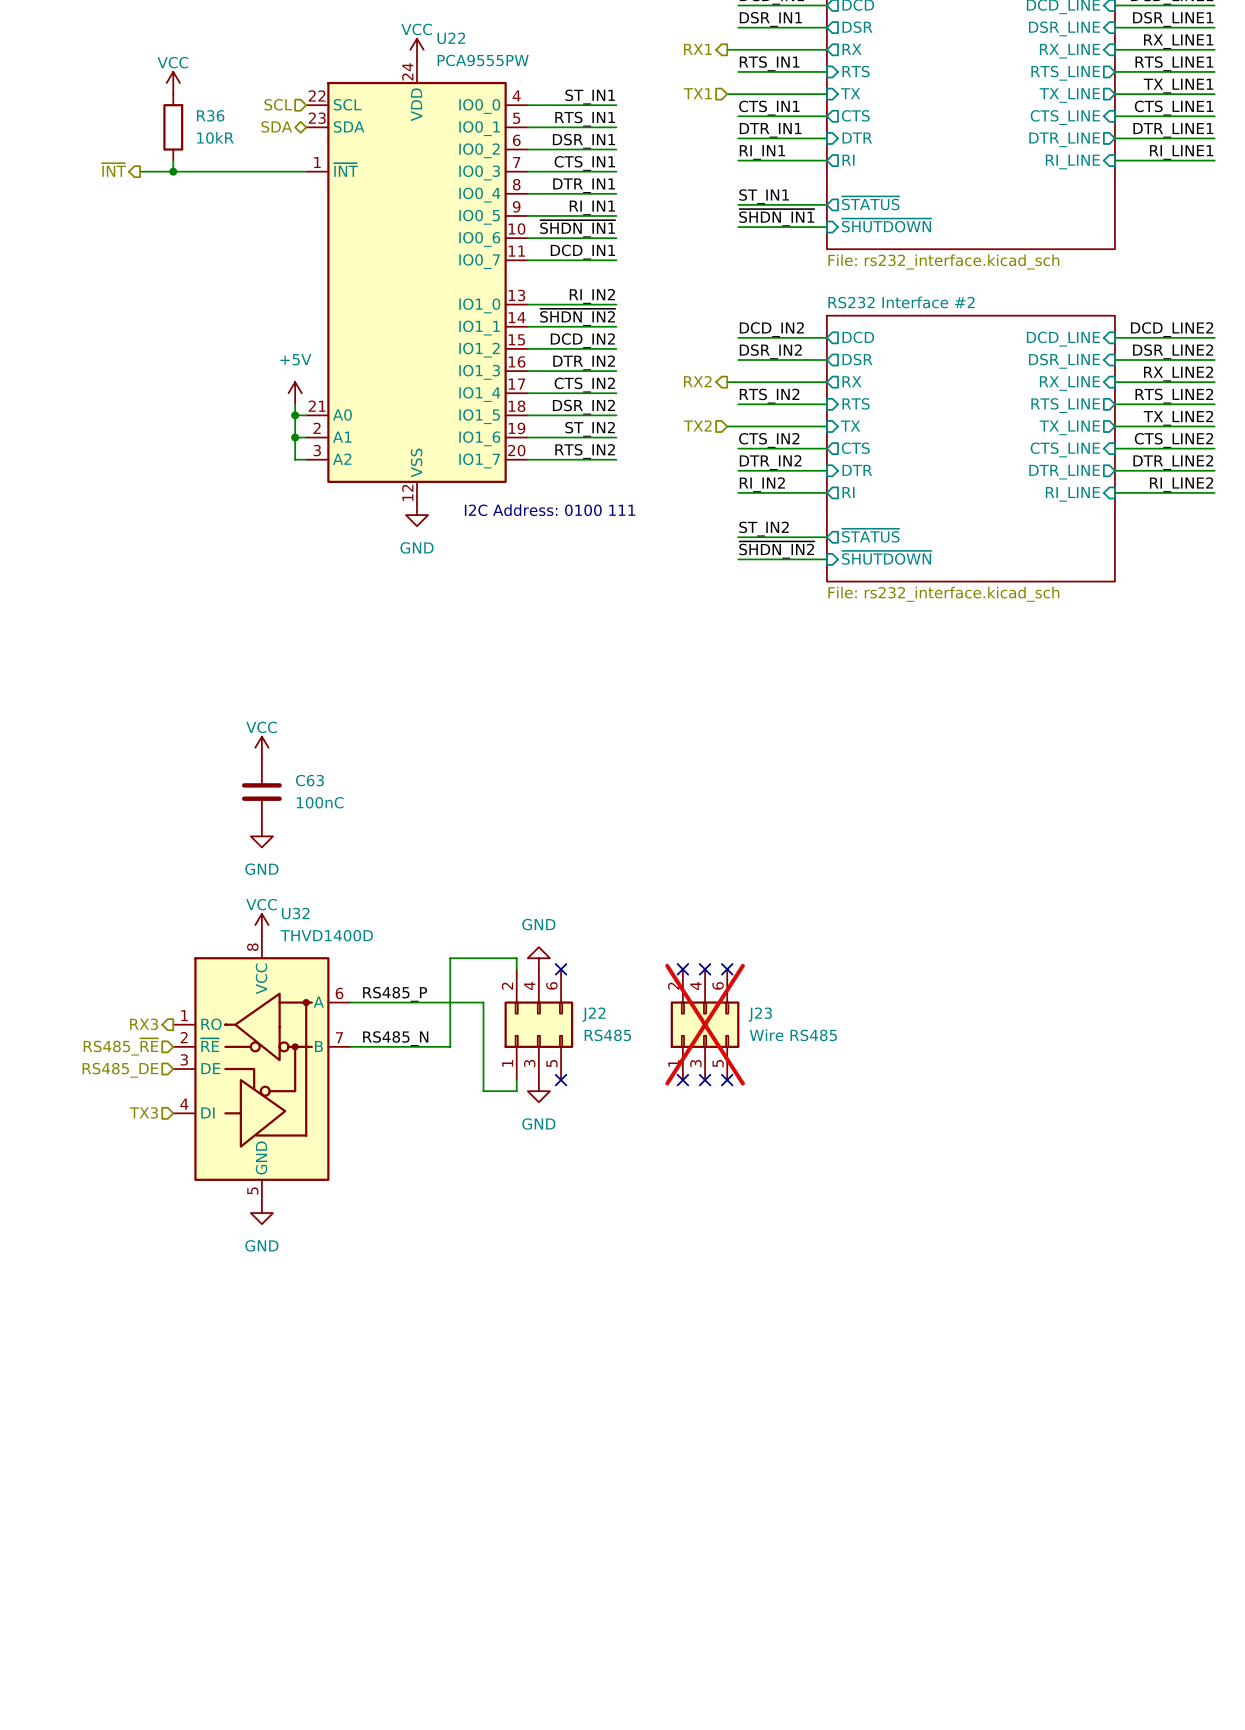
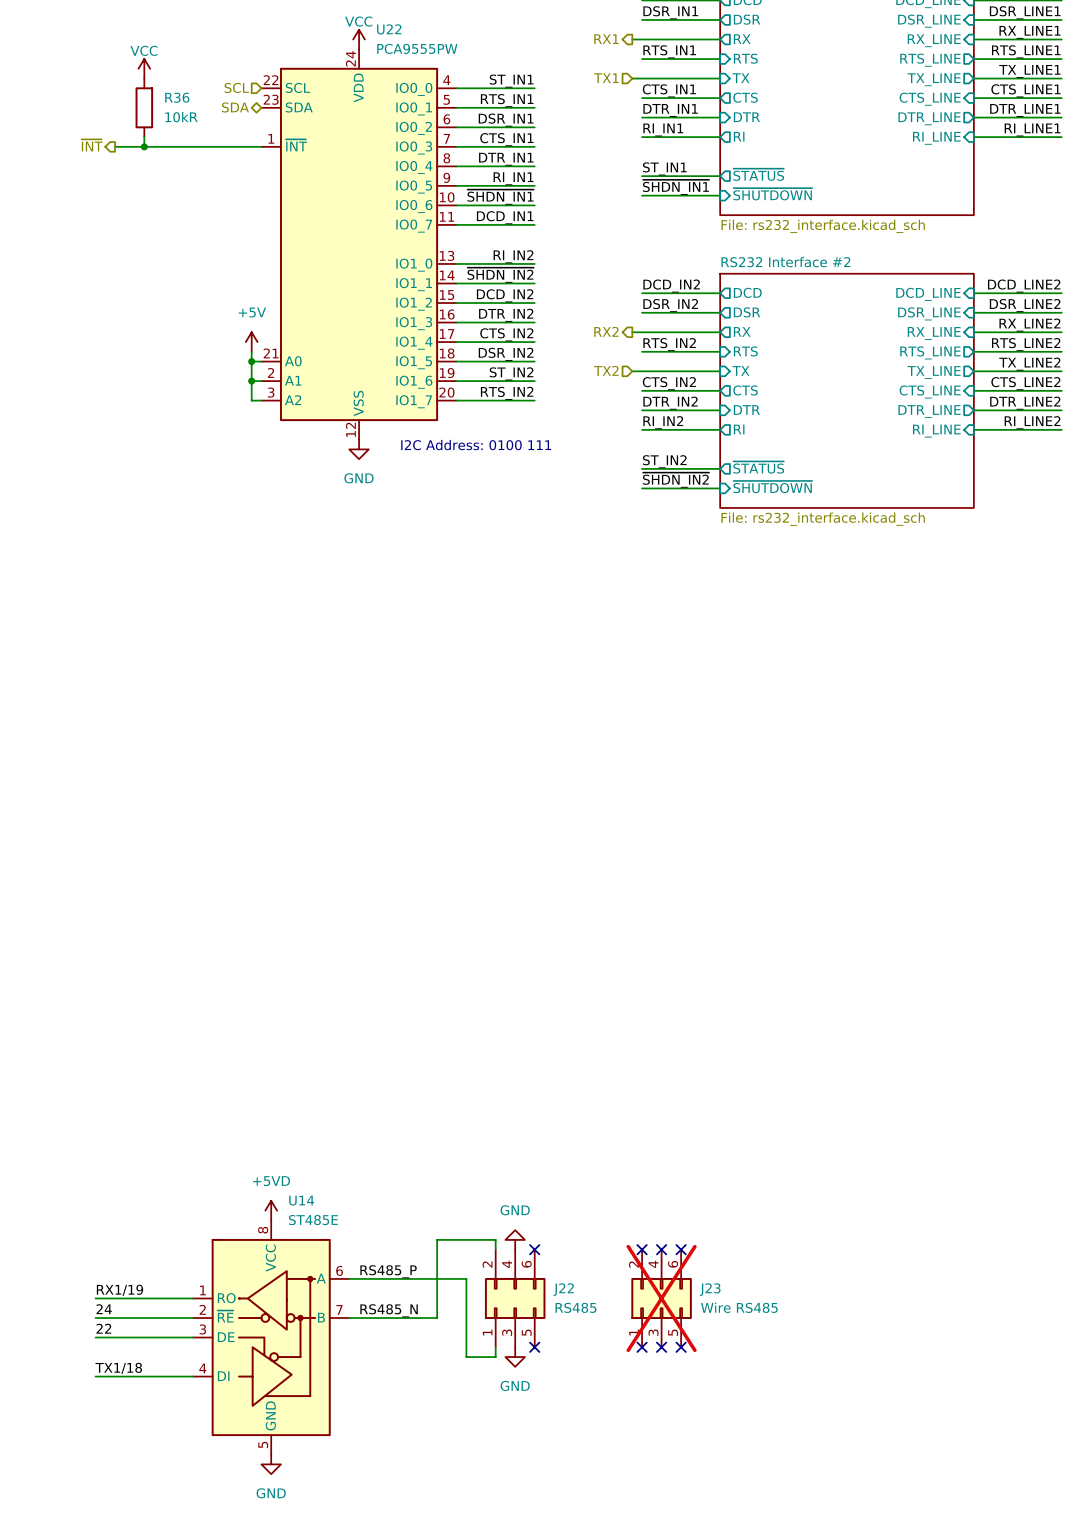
power symbol: VCC (261, 747) -> none
C63: 100nC (261, 792) -> none
power symbol: GND (261, 836) -> none
power symbol: VCC (261, 925) -> none
power symbol: GND (538, 958) -> none
wire: (516, 969) (516, 958) (450, 958) (450, 1046) (350, 1046) -> none
no-connect mark: (561, 969) -> none
no-connect mark: (682, 969) -> none
no-connect mark: (705, 969) -> none
no-connect mark: (727, 969) -> none
label: RS485_P (395, 994) -> none
wire: (350, 1002) (483, 1002) (483, 1091) (516, 1091) (516, 1080) -> none
hierarchical label: RX3 (144, 1024) -> none
J22 position: (538, 1024) -> (515, 1298)
J23 position: (705, 1024) -> (661, 1298)
label: RS485_N (395, 1038) -> none
hierarchical label: RS485_~{RE} (120, 1046) -> none
U32: THVD1400D (261, 1069) -> none
hierarchical label: RS485_DE (120, 1070) -> none
no-connect mark: (561, 1080) -> none
no-connect mark: (682, 1080) -> none
no-connect mark: (705, 1080) -> none
no-connect mark: (727, 1080) -> none
power symbol: GND (538, 1091) -> none
hierarchical label: TX3 (143, 1112) -> none
power symbol: GND (261, 1213) -> none
power symbol: none -> +5VD (271, 1210)
power symbol: none -> GND (515, 1239)
wire: none -> (495, 1249) (495, 1239) (437, 1239) (437, 1318) (349, 1318)
no-connect mark: none -> (534, 1249)
no-connect mark: none -> (642, 1249)
no-connect mark: none -> (661, 1249)
no-connect mark: none -> (681, 1249)
label: none -> RS485_P (388, 1271)
wire: none -> (349, 1278) (466, 1278) (466, 1357) (495, 1357) (495, 1347)
label: none -> RX1/19 (119, 1290)
wire: none -> (95, 1298) (193, 1298)
label: none -> 24 (104, 1309)
label: none -> RS485_N (389, 1310)
wire: none -> (95, 1318) (193, 1318)
label: none -> 22 (103, 1328)
wire: none -> (95, 1337) (193, 1337)
U14: none -> ST485E (271, 1337)
no-connect mark: none -> (534, 1347)
no-connect mark: none -> (642, 1347)
no-connect mark: none -> (661, 1347)
no-connect mark: none -> (681, 1347)
power symbol: none -> GND (515, 1357)
label: none -> TX1/18 (118, 1368)
wire: none -> (95, 1376) (193, 1376)
power symbol: none -> GND (271, 1464)

